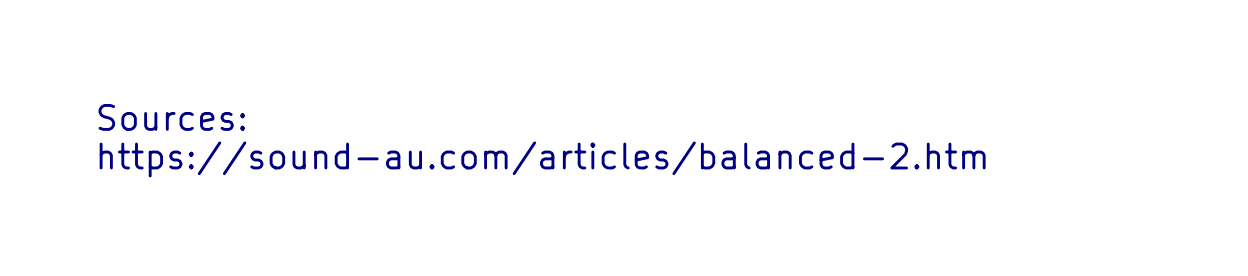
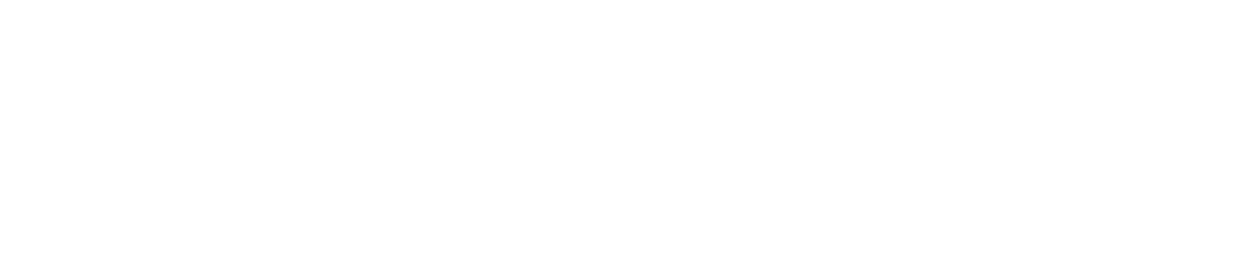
text: Sources: (171, 117) -> none
text: https://sound-au.com/articles/balanced-2.htm (542, 159) -> none

